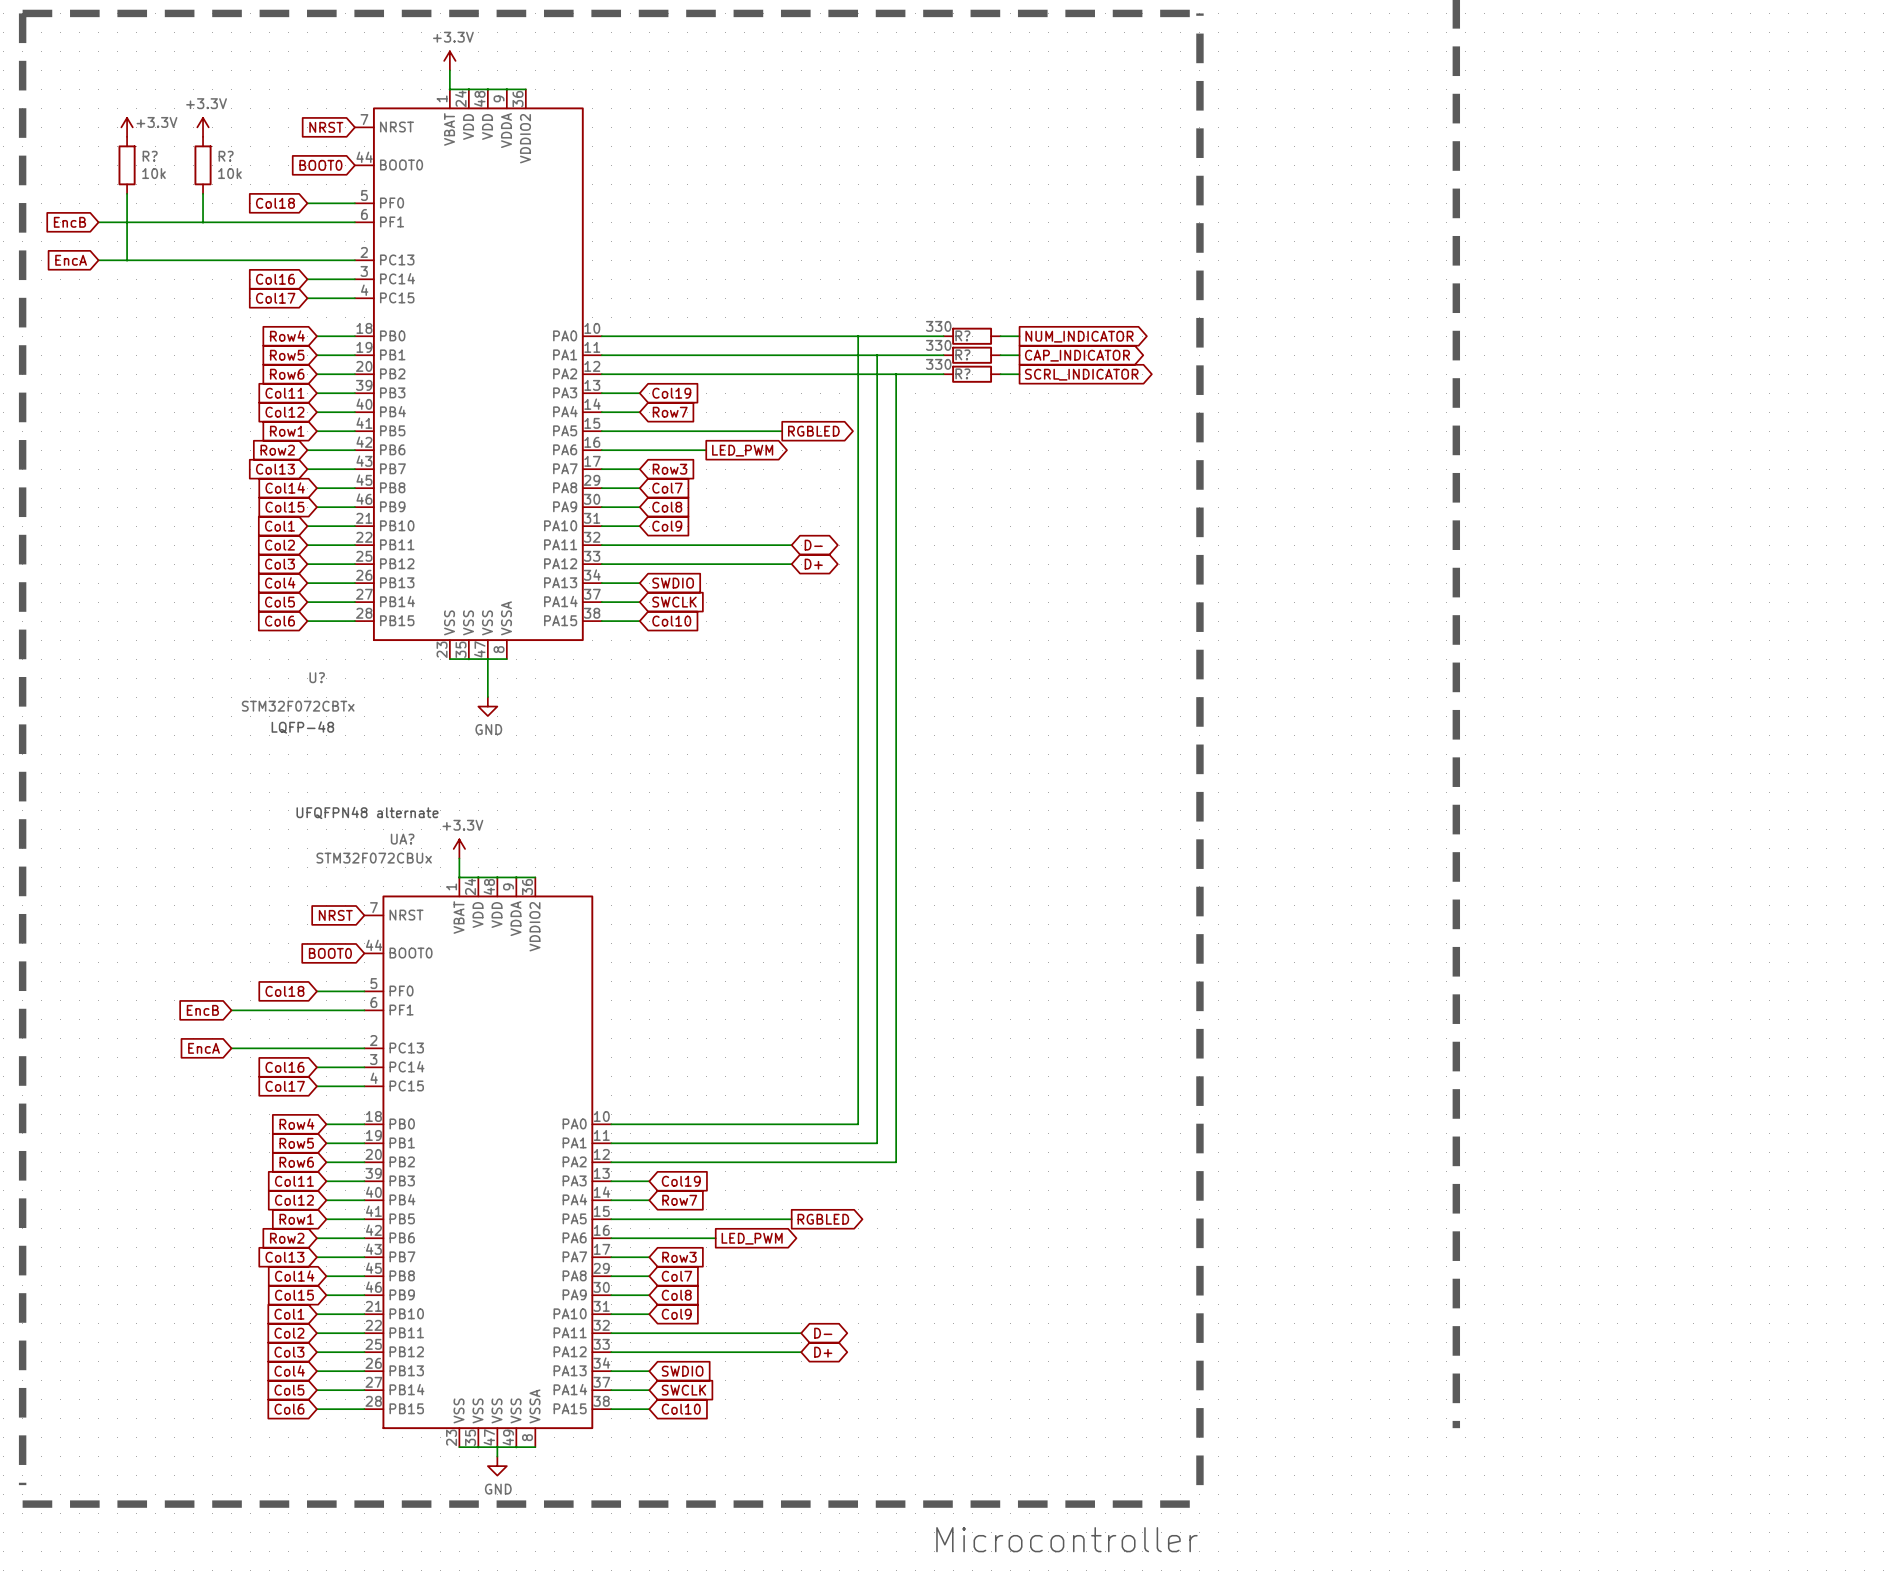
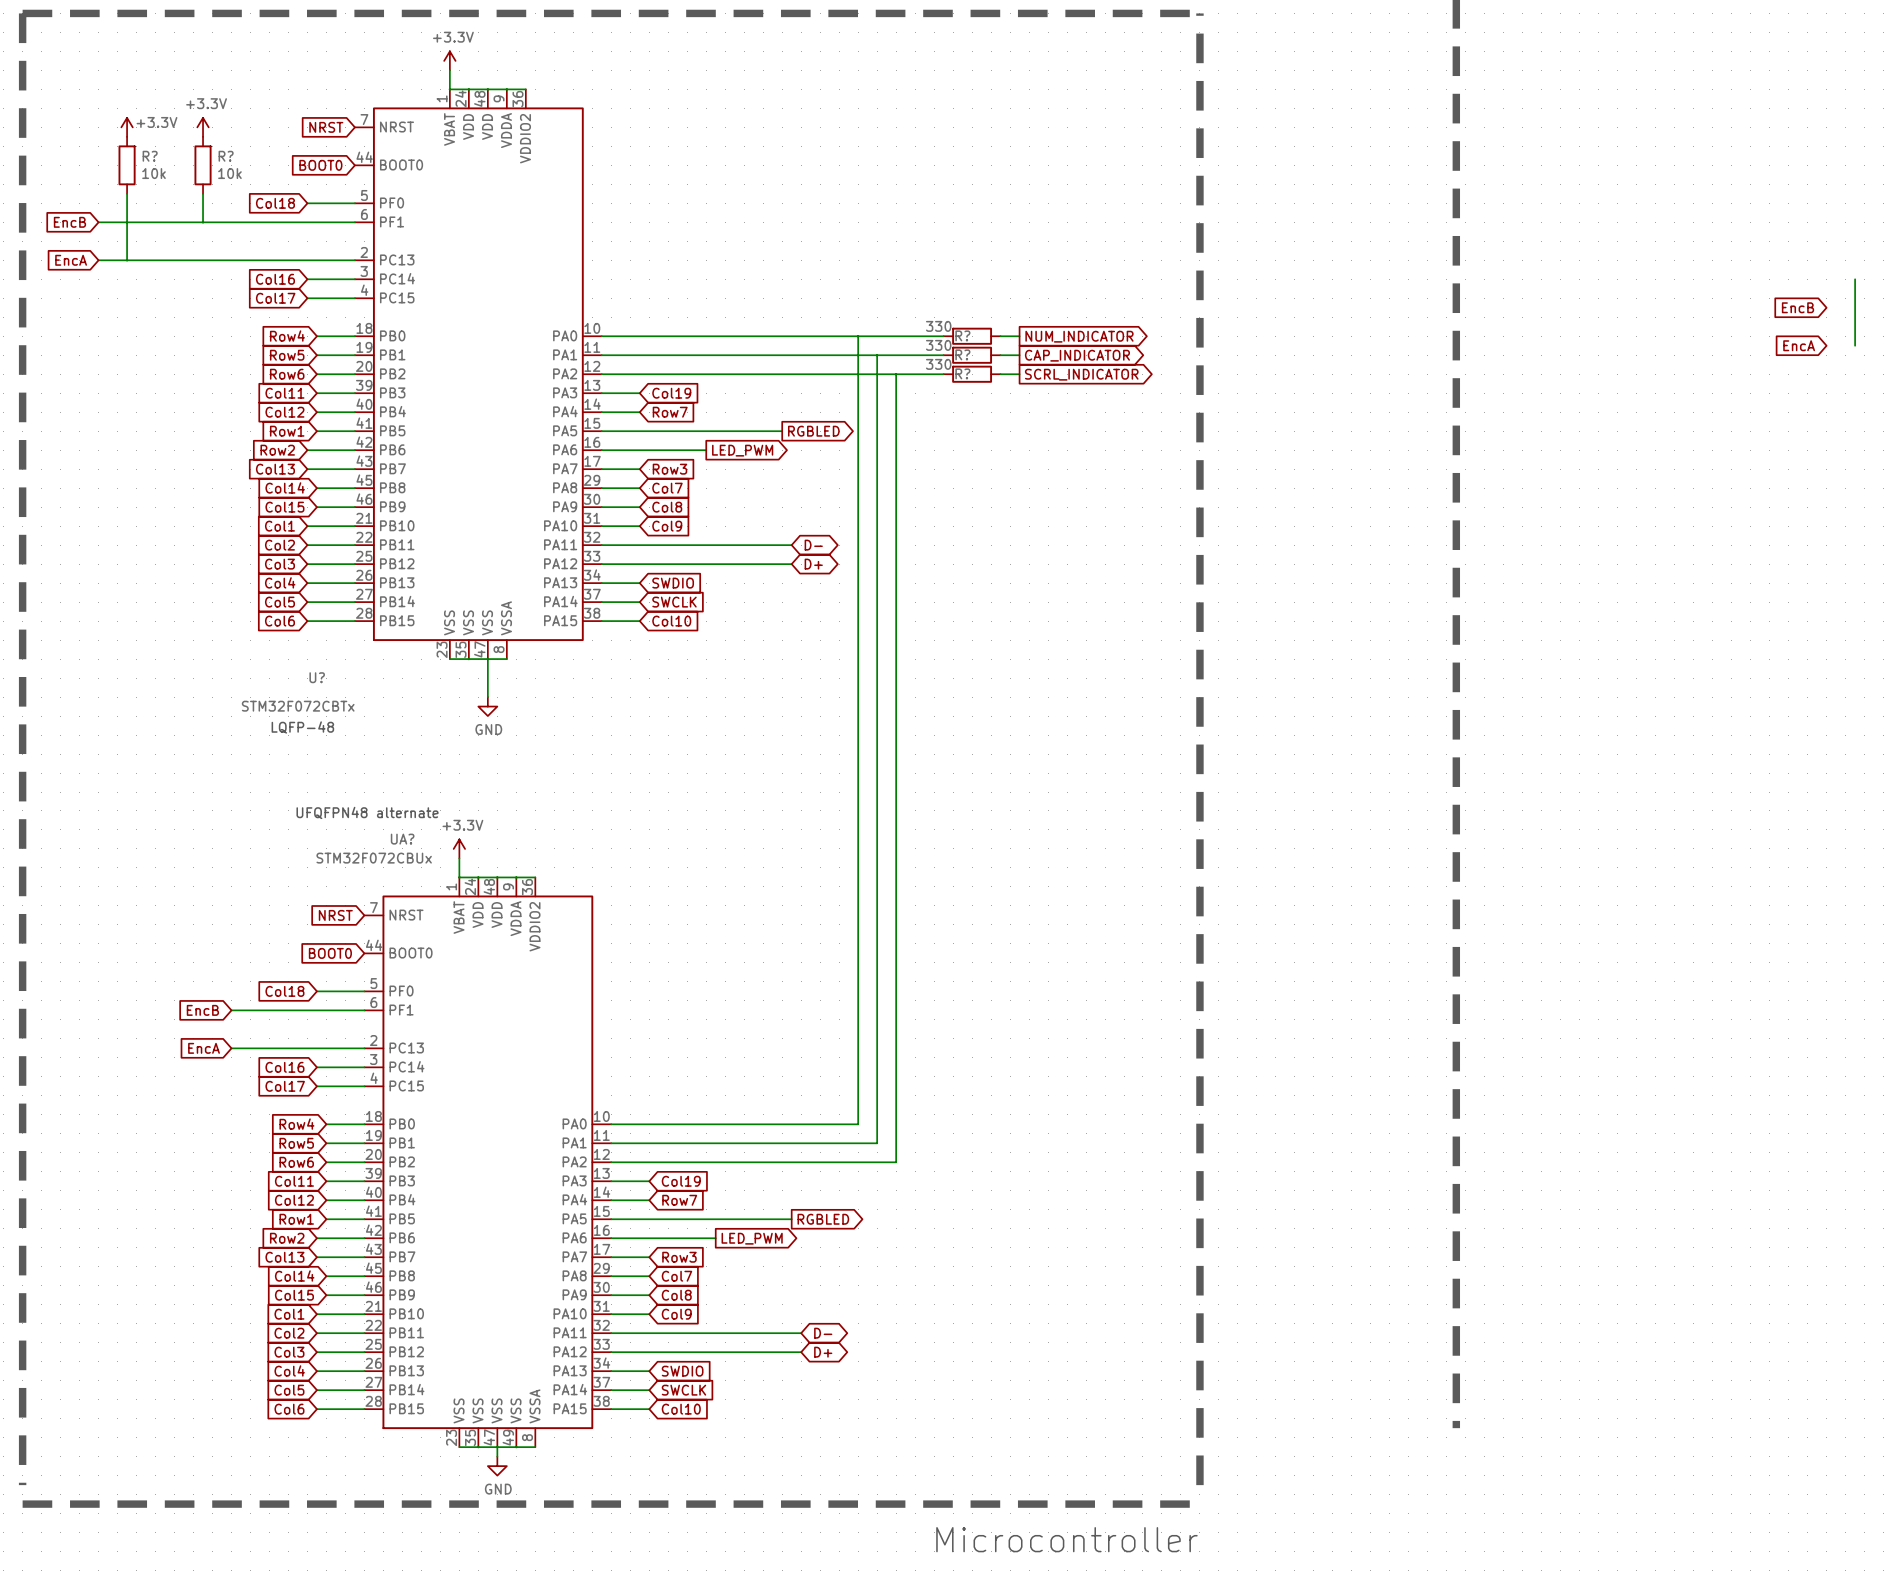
wire: none -> (1855, 279) (1855, 345)
global label: none -> EncB (1797, 307)
global label: none -> EncA (1799, 345)

